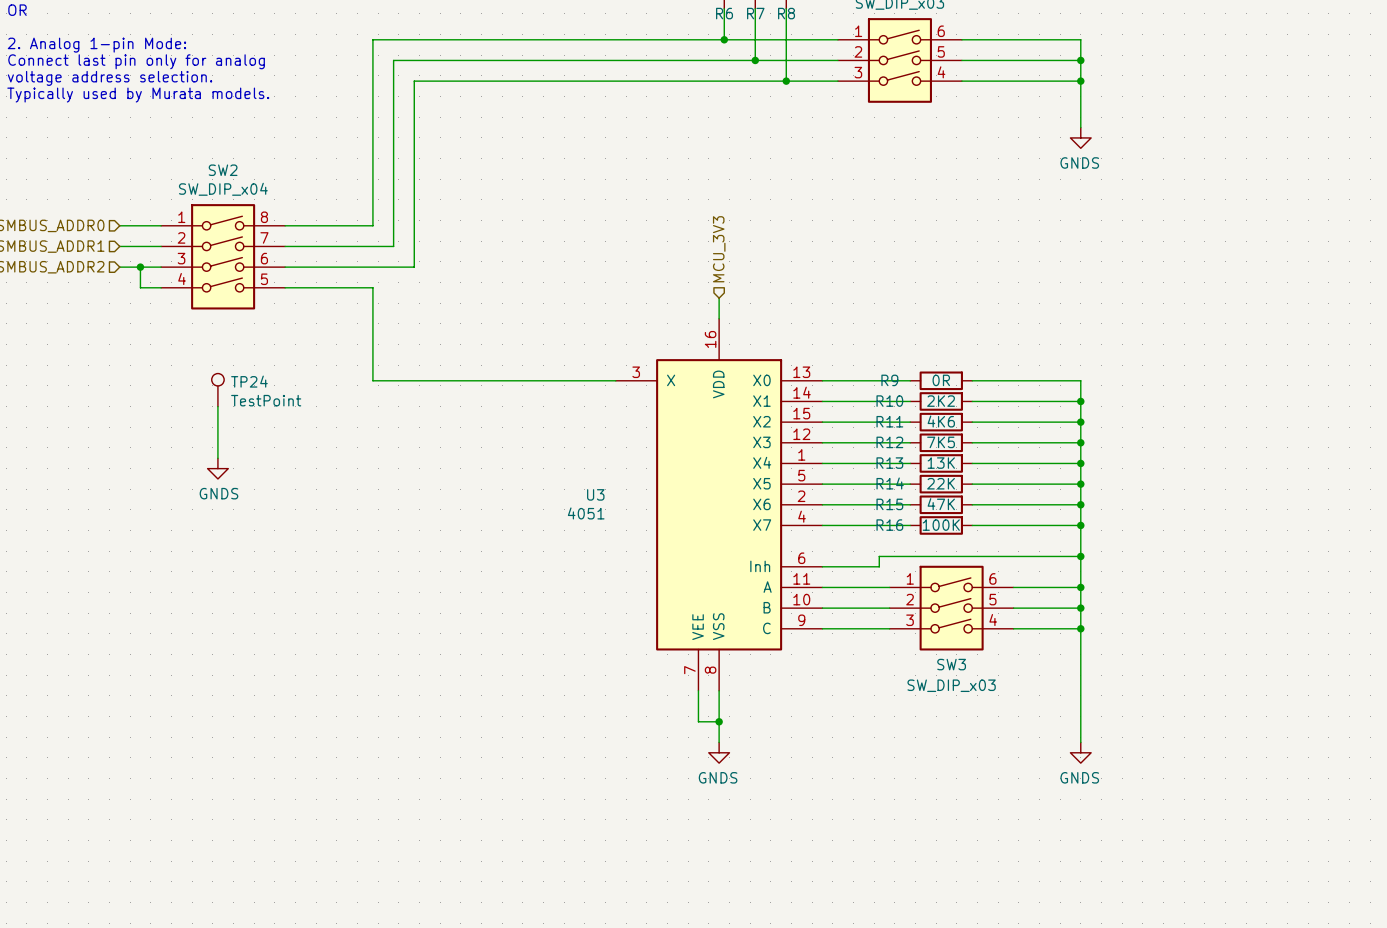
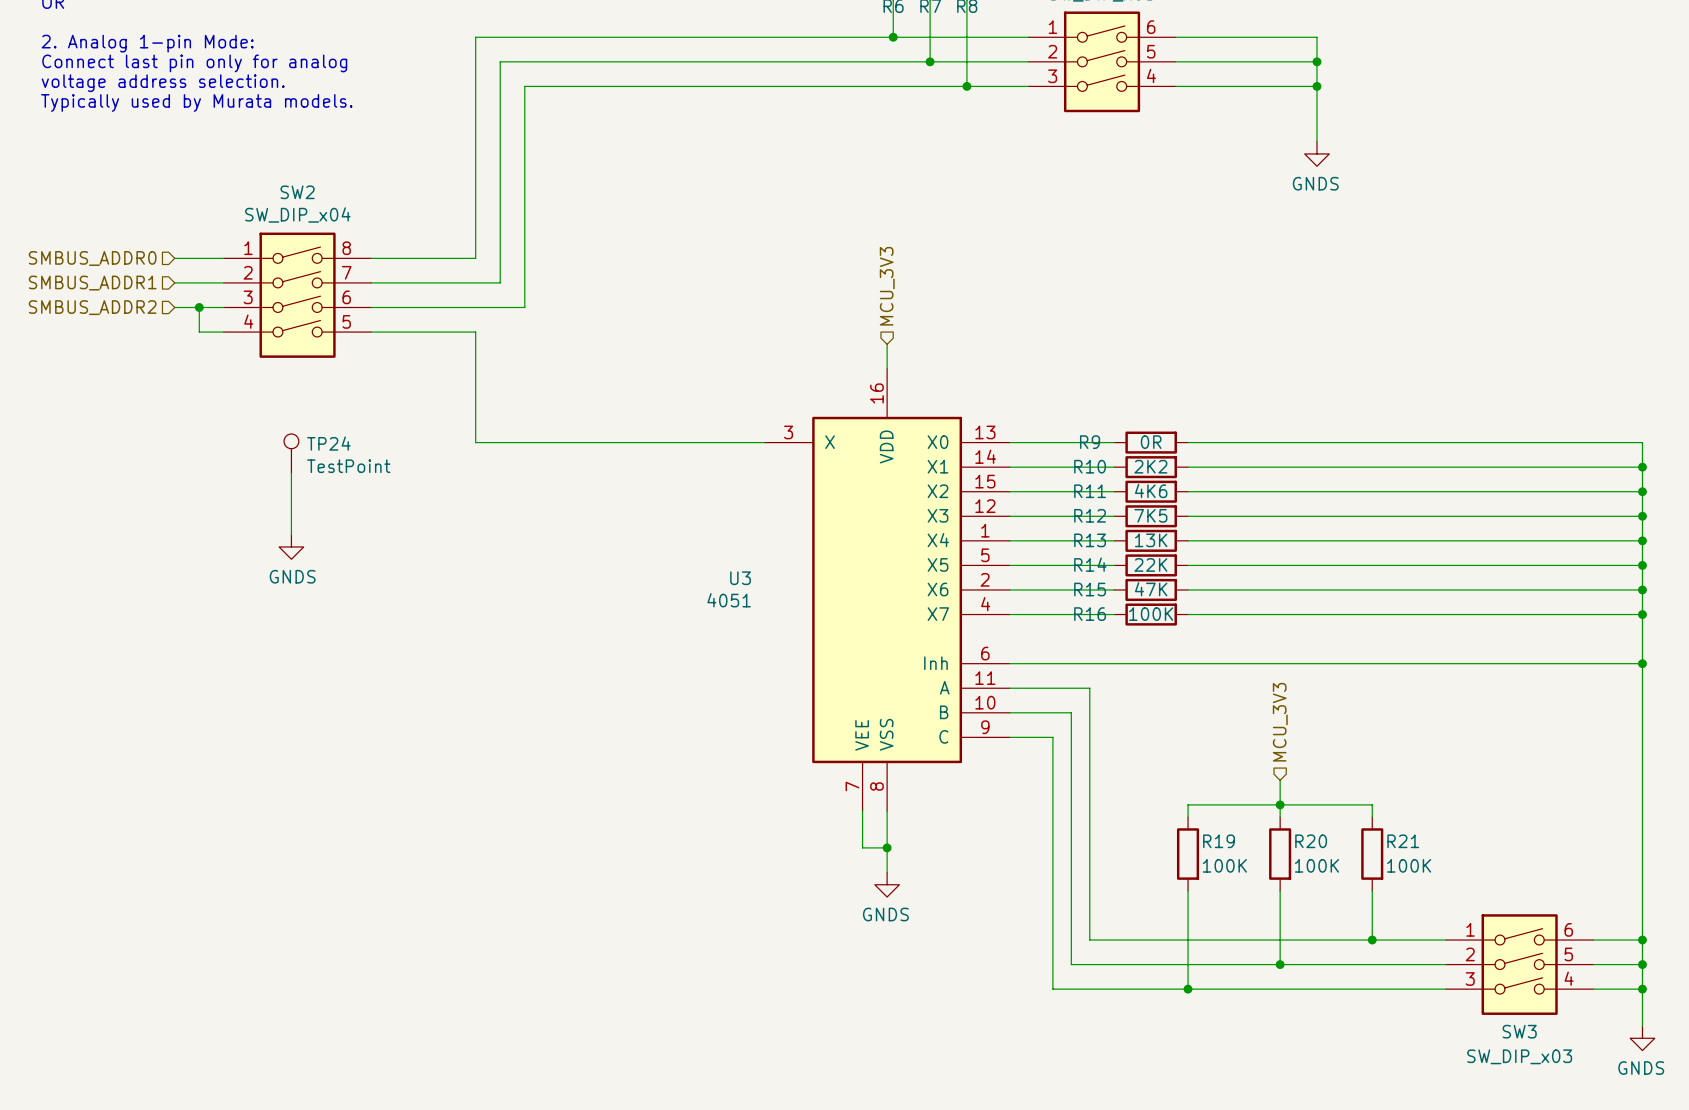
wire: (1080, 380) (1080, 742) -> (1316, 442) (1642, 442) (1642, 1025)
wire: none -> (1316, 467) (1642, 467)
junction: (1080, 401) -> none
junction: none -> (1642, 467)
wire: none -> (1316, 491) (1642, 491)
junction: (1080, 422) -> none
junction: none -> (1642, 491)
wire: none -> (1316, 516) (1642, 516)
junction: (1080, 442) -> none
junction: none -> (1642, 516)
wire: none -> (1316, 540) (1642, 540)
junction: (1080, 463) -> none
junction: none -> (1642, 540)
wire: none -> (1316, 565) (1642, 565)
junction: (1080, 484) -> none
junction: none -> (1642, 565)
wire: none -> (1316, 589) (1642, 589)
junction: (1080, 504) -> none
junction: none -> (1642, 589)
wire: none -> (1316, 614) (1642, 614)
junction: (1080, 525) -> none
junction: none -> (1642, 614)
wire: (1080, 556) (879, 556) (879, 566) -> (1642, 663) (1077, 663)
junction: (1080, 556) -> none
junction: none -> (1642, 663)
wire: none -> (1089, 688) (1089, 940) (1445, 940)
wire: (1013, 587) (1080, 587) -> none
junction: (1080, 587) -> none
wire: (874, 608) (889, 608) -> (1071, 712) (1071, 964) (1445, 964)
SW3 position: (951, 608) -> (1519, 964)
wire: (1013, 608) (1080, 608) -> none
junction: (1080, 608) -> none
hierarchical label: none -> MCU_3V3 (1280, 722)
wire: (858, 628) (889, 628) -> (1052, 737) (1052, 989) (1445, 989)
wire: (1013, 628) (1080, 628) -> none
junction: (1080, 628) -> none
wire: none -> (1280, 780) (1280, 817)
junction: none -> (1280, 804)
wire: none -> (1188, 817) (1188, 804) (1372, 804) (1372, 817)
R19: none -> 100K (1188, 854)
R20: none -> 100K (1280, 854)
R21: none -> 100K (1372, 854)
power symbol: GNDS (1080, 752) -> none
wire: none -> (1188, 890) (1188, 989)
wire: none -> (1280, 890) (1280, 964)
wire: none -> (1372, 890) (1372, 940)
junction: none -> (1372, 940)
wire: none -> (1593, 940) (1642, 940)
junction: none -> (1642, 940)
junction: none -> (1280, 964)
wire: none -> (1593, 964) (1642, 964)
junction: none -> (1642, 964)
junction: none -> (1188, 989)
wire: none -> (1593, 989) (1642, 989)
junction: none -> (1642, 989)
power symbol: none -> GNDS (1642, 1038)

